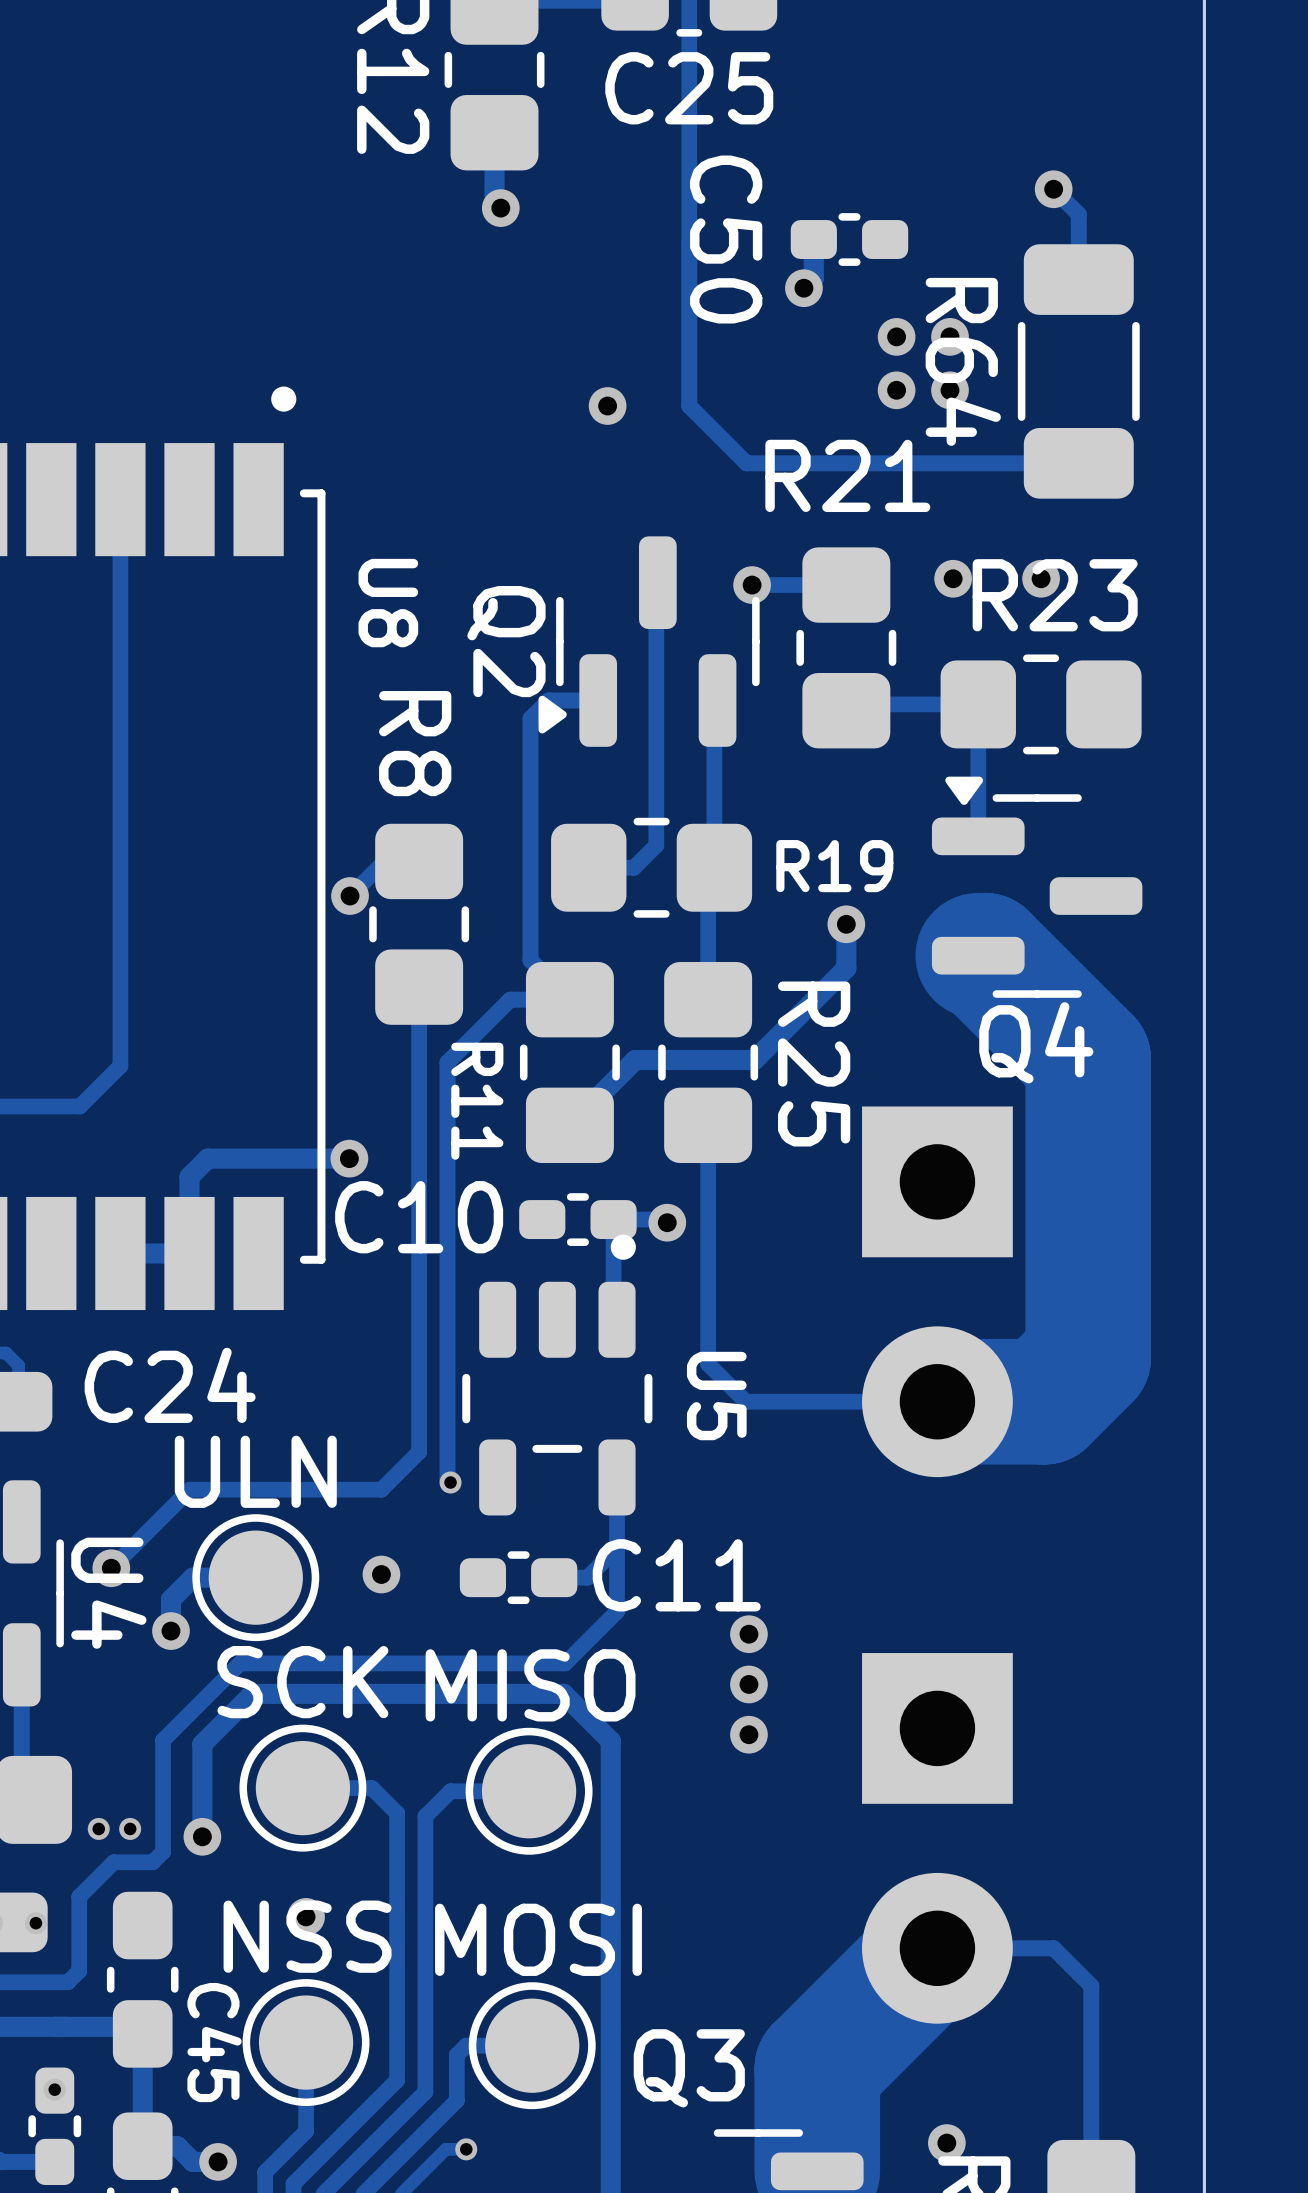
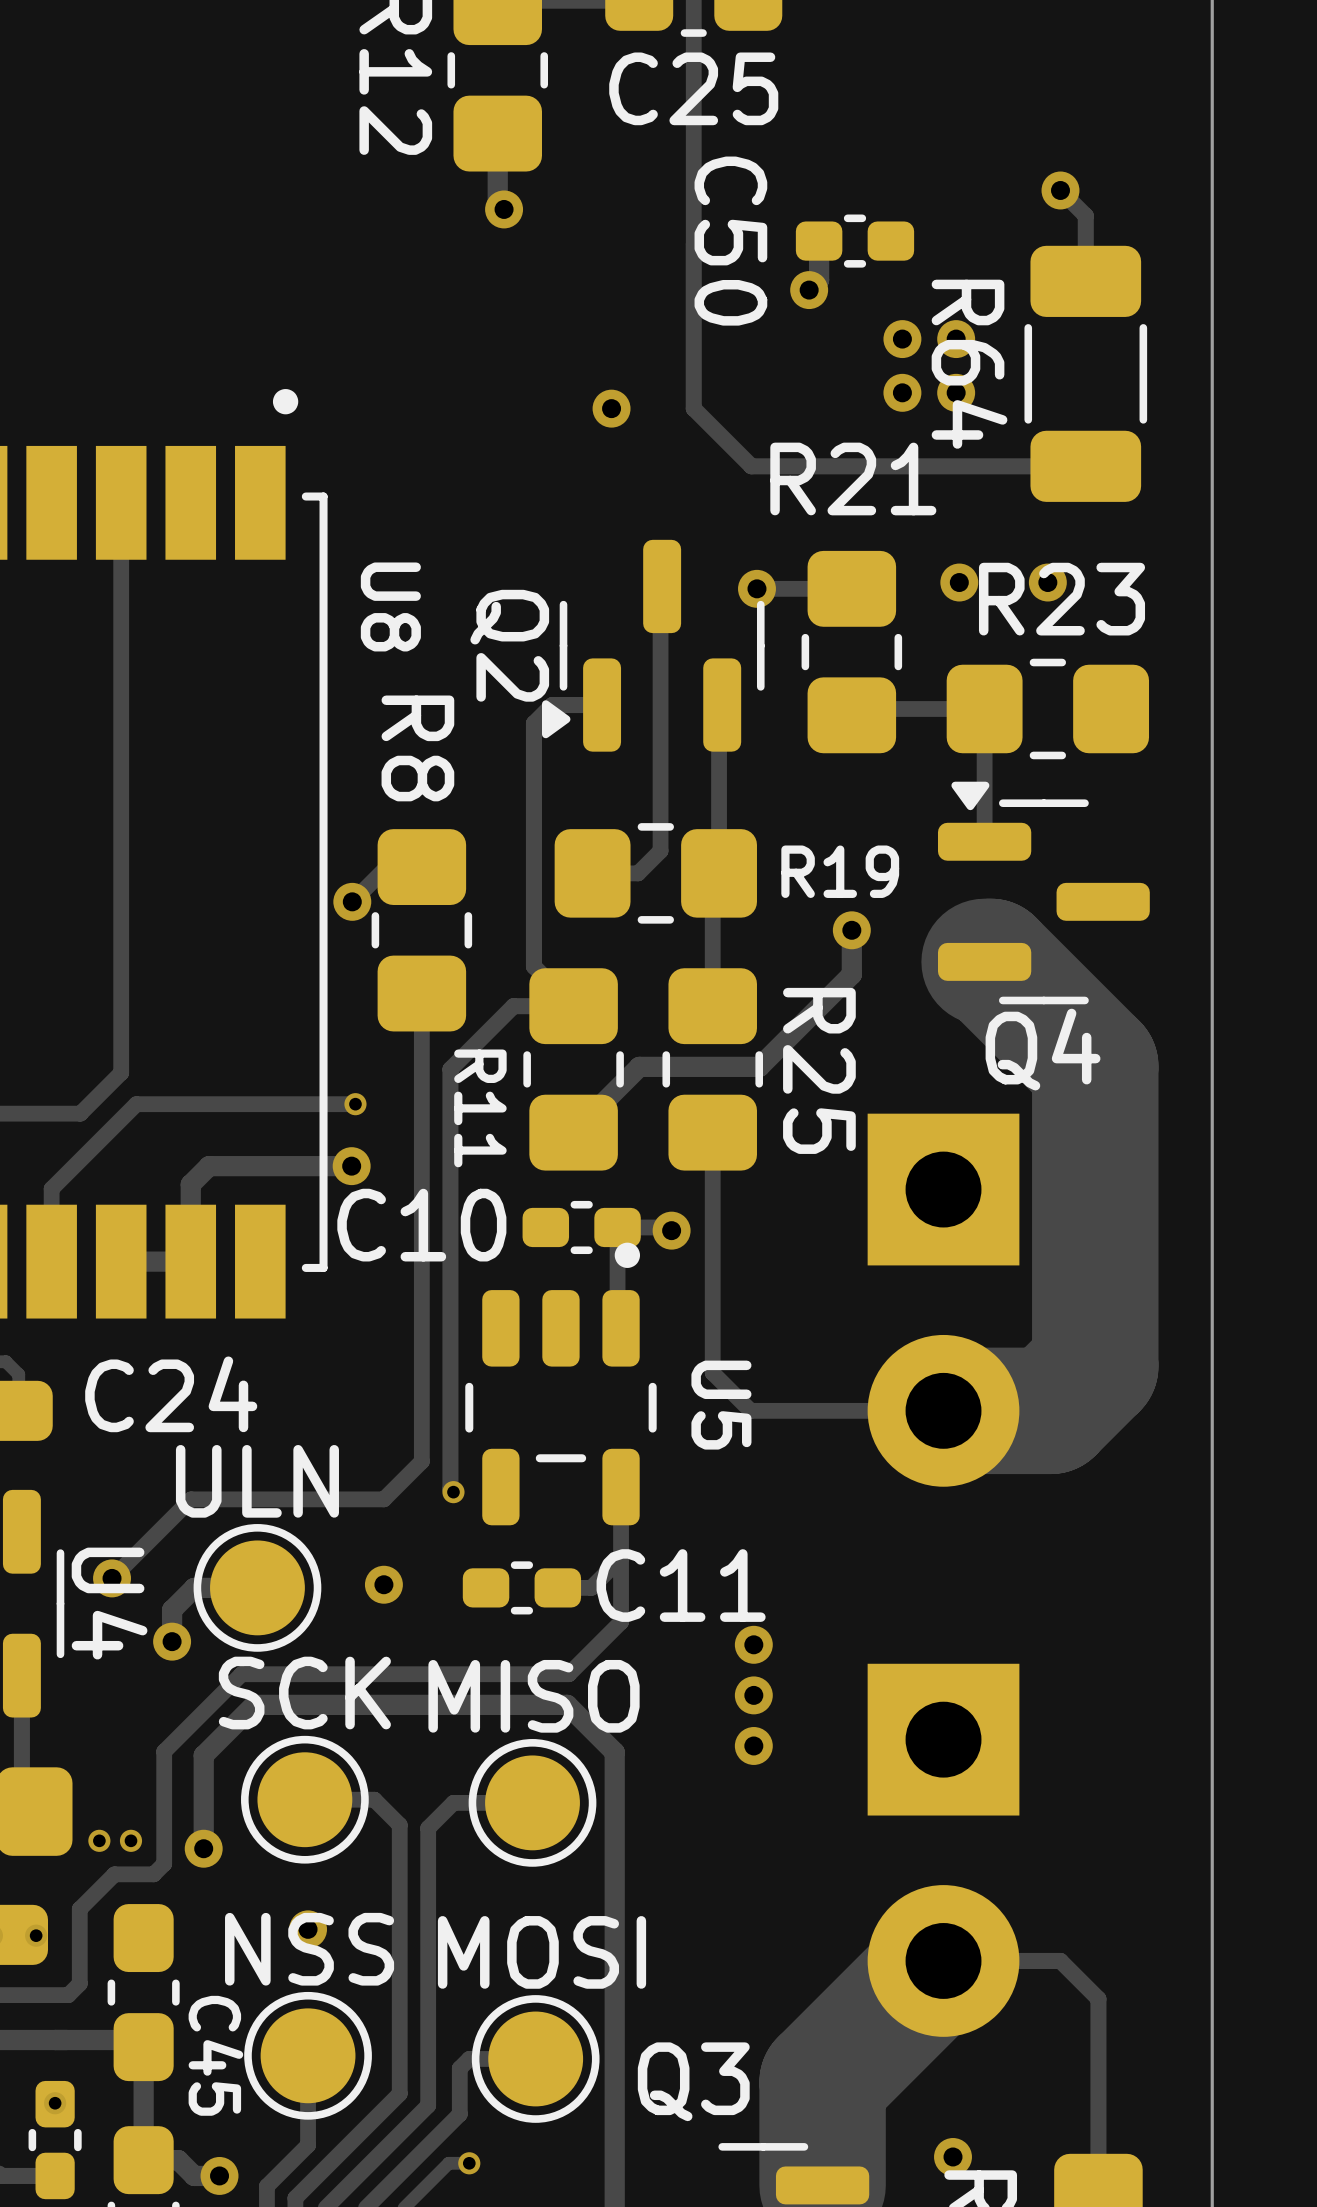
track: none -> (352, 1104) (136, 1104) (51, 1188) (51, 1261)
via: none -> (355, 1104)

